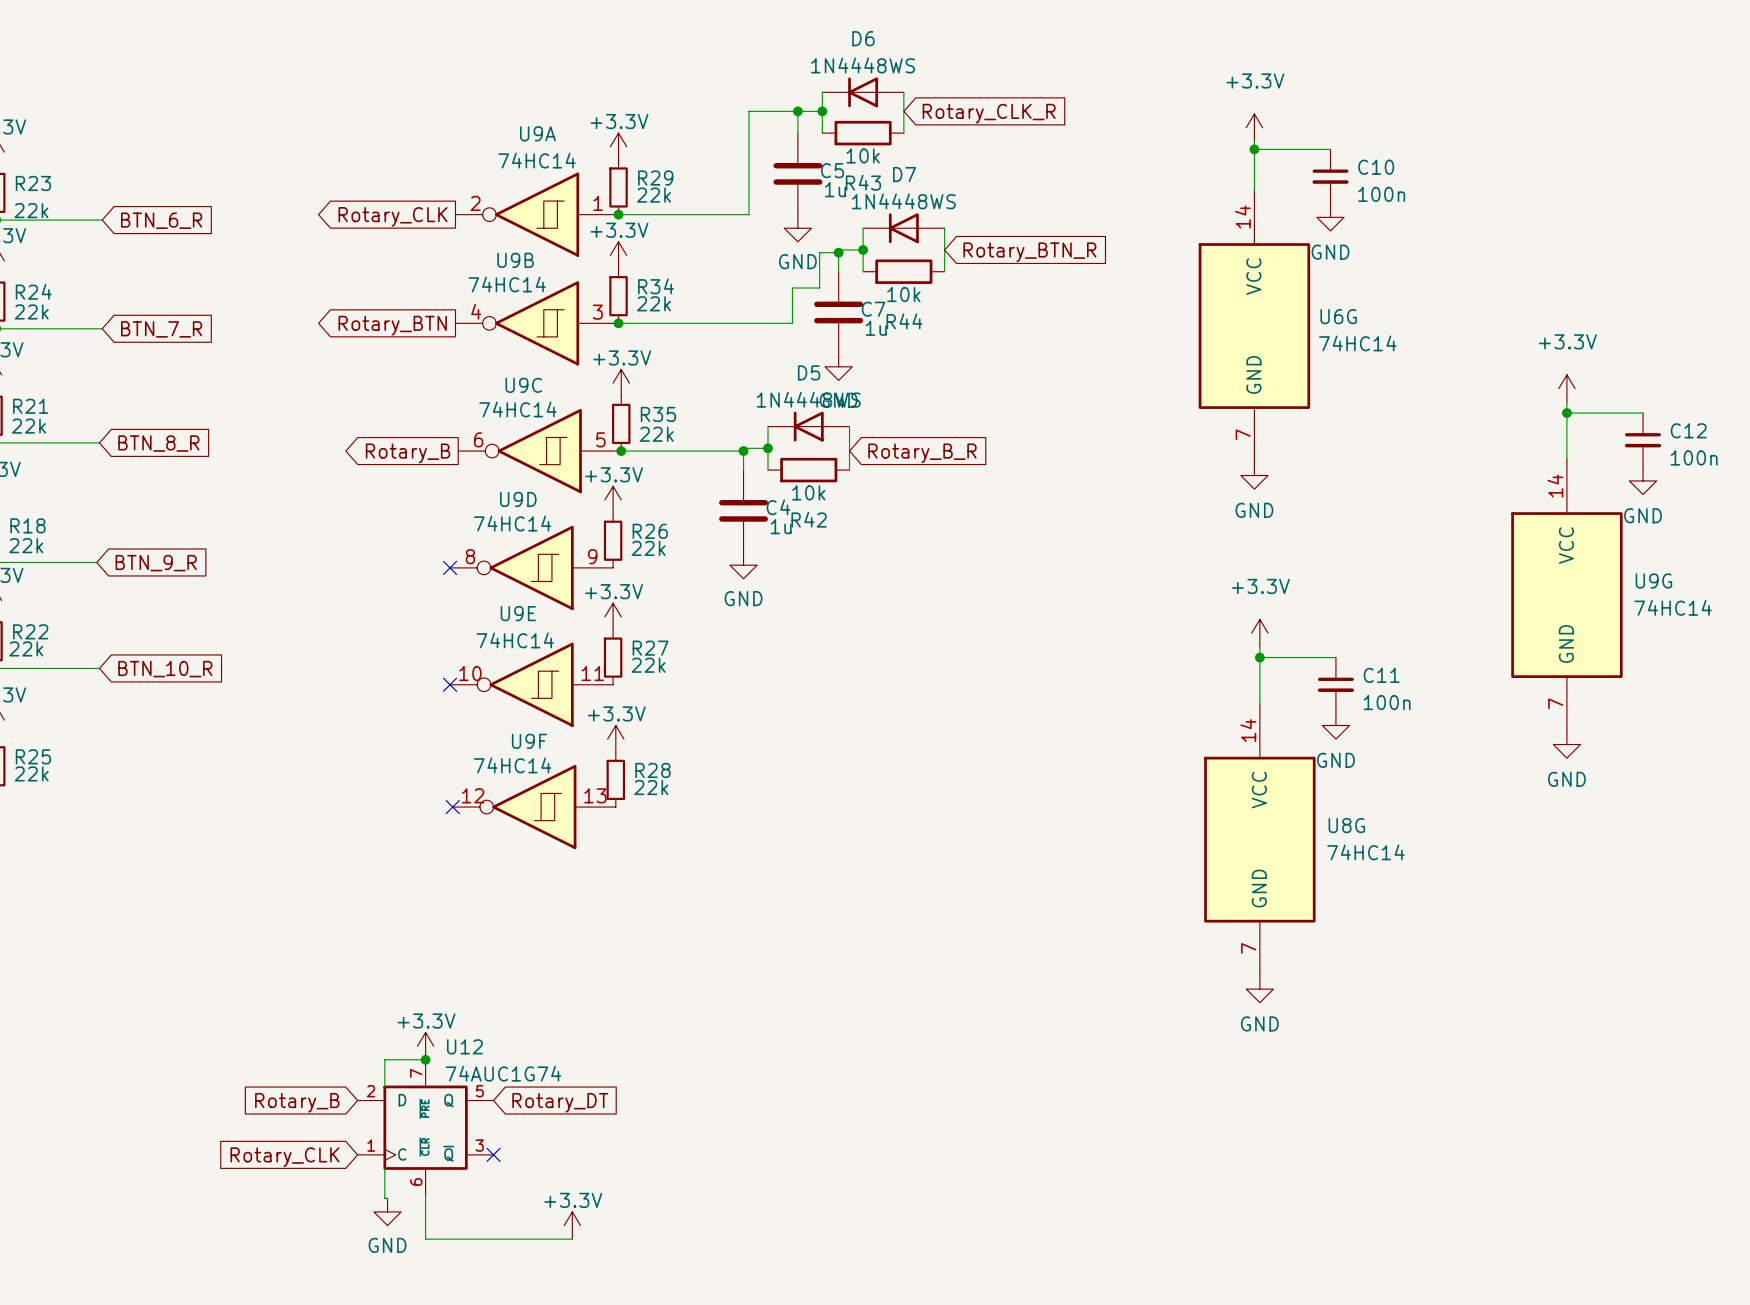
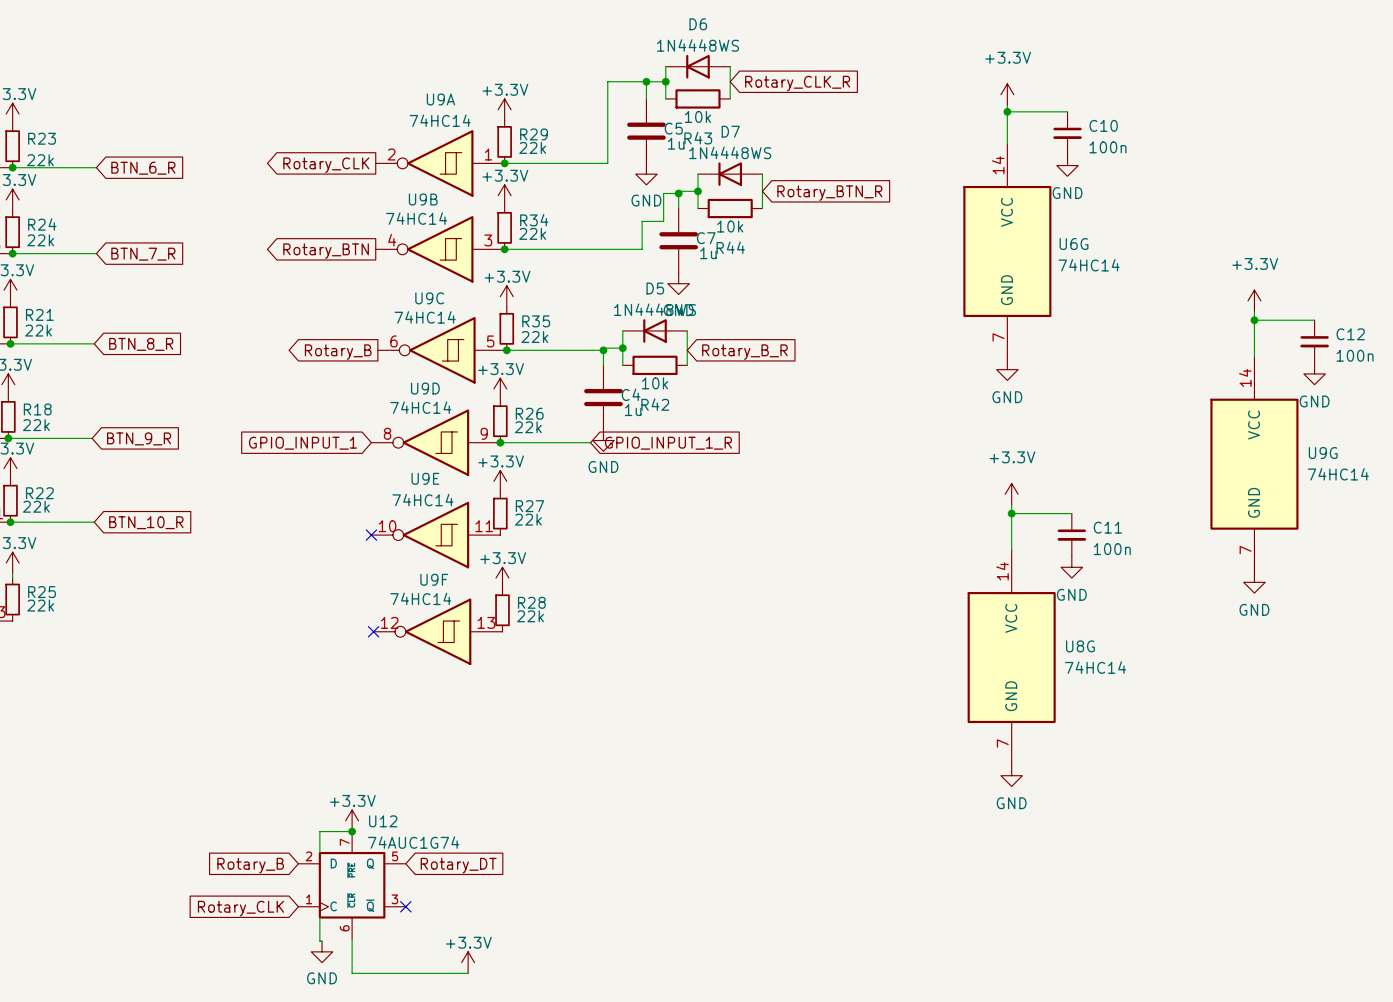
no-connect mark: (450, 567) -> none
wire: none -> (500, 442) (590, 442)
junction: none -> (500, 442)
global label: none -> GPIO_INPUT_1 (303, 443)
global label: none -> GPIO_INPUT_1_R (668, 443)

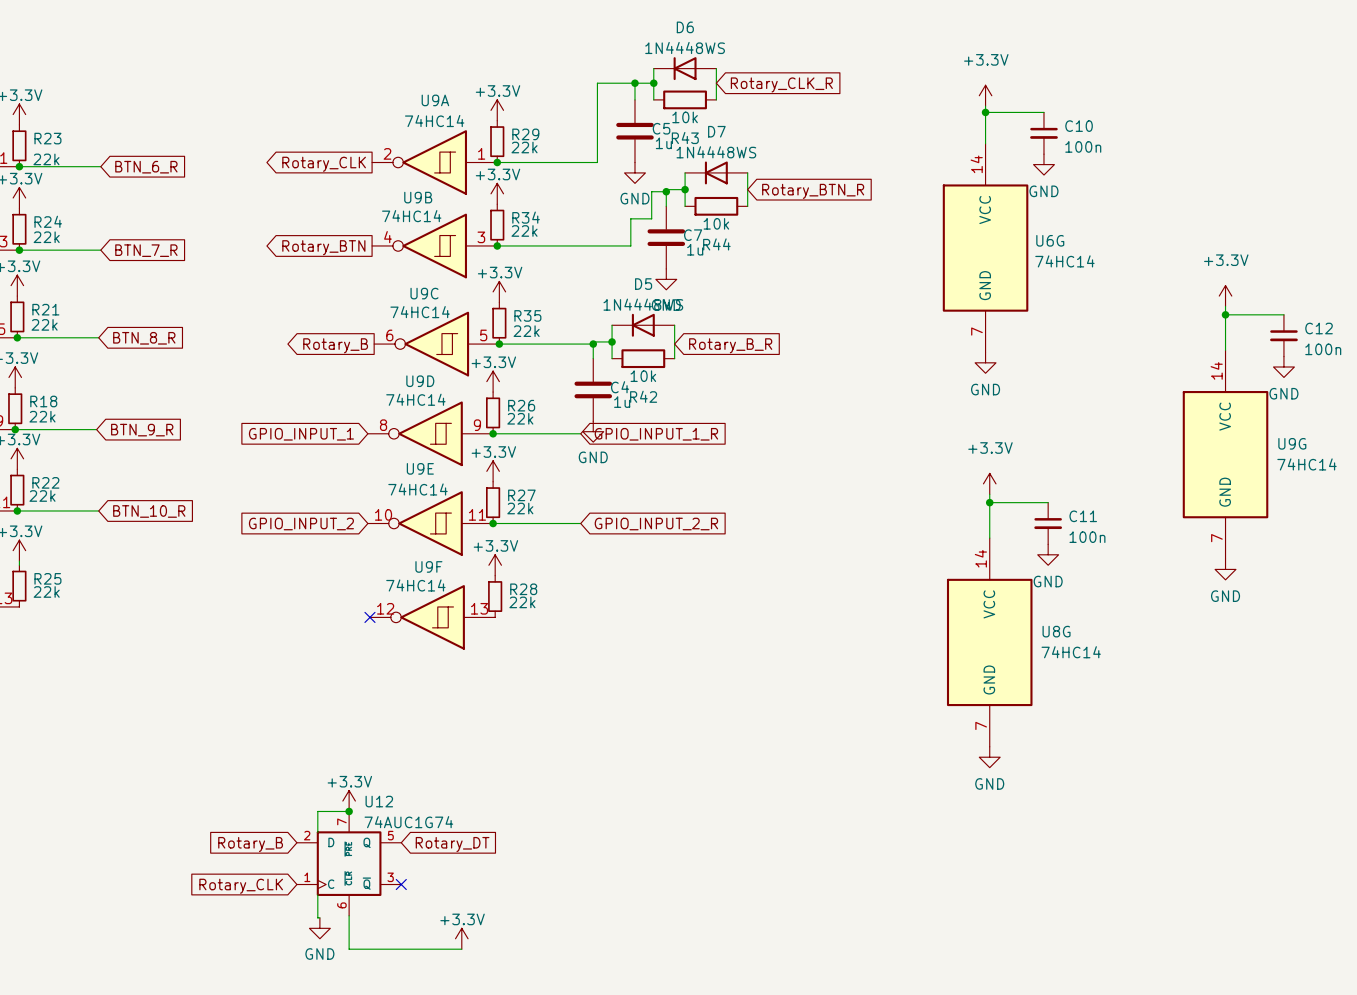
global label: none -> GPIO_INPUT_2 (301, 524)
no-connect mark: (371, 535) -> none
wire: none -> (493, 523) (580, 523)
junction: none -> (493, 523)
global label: none -> GPIO_INPUT_2_R (656, 524)

